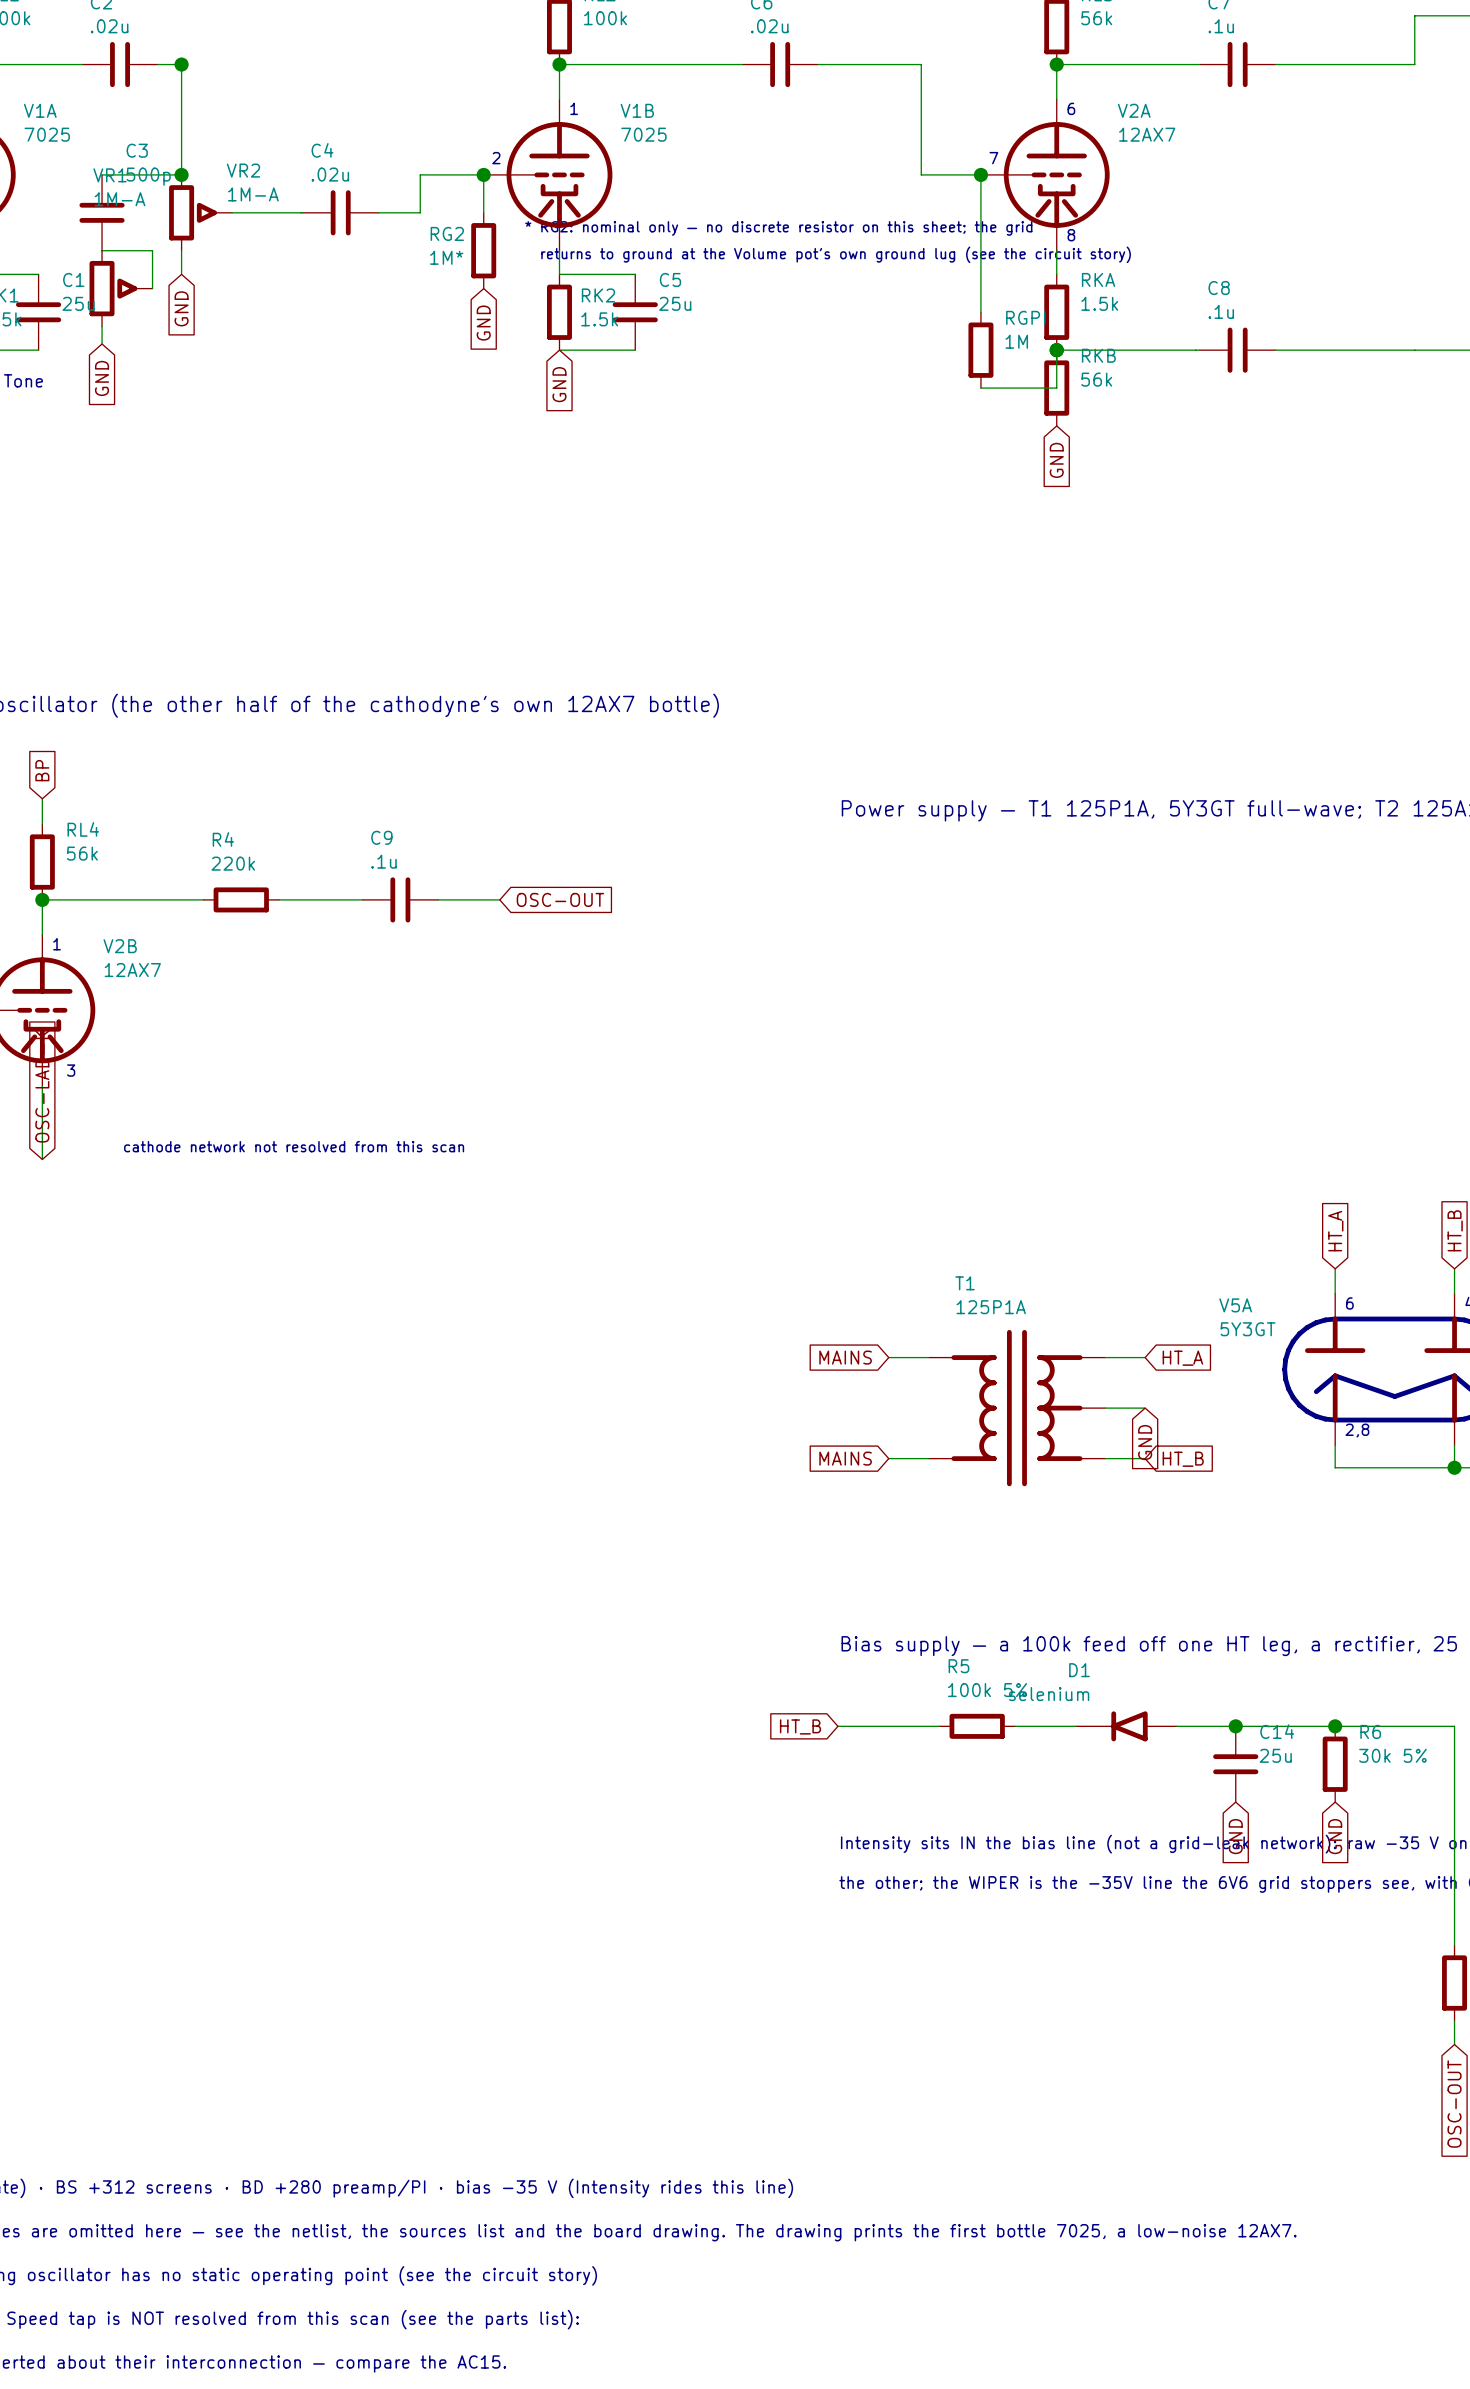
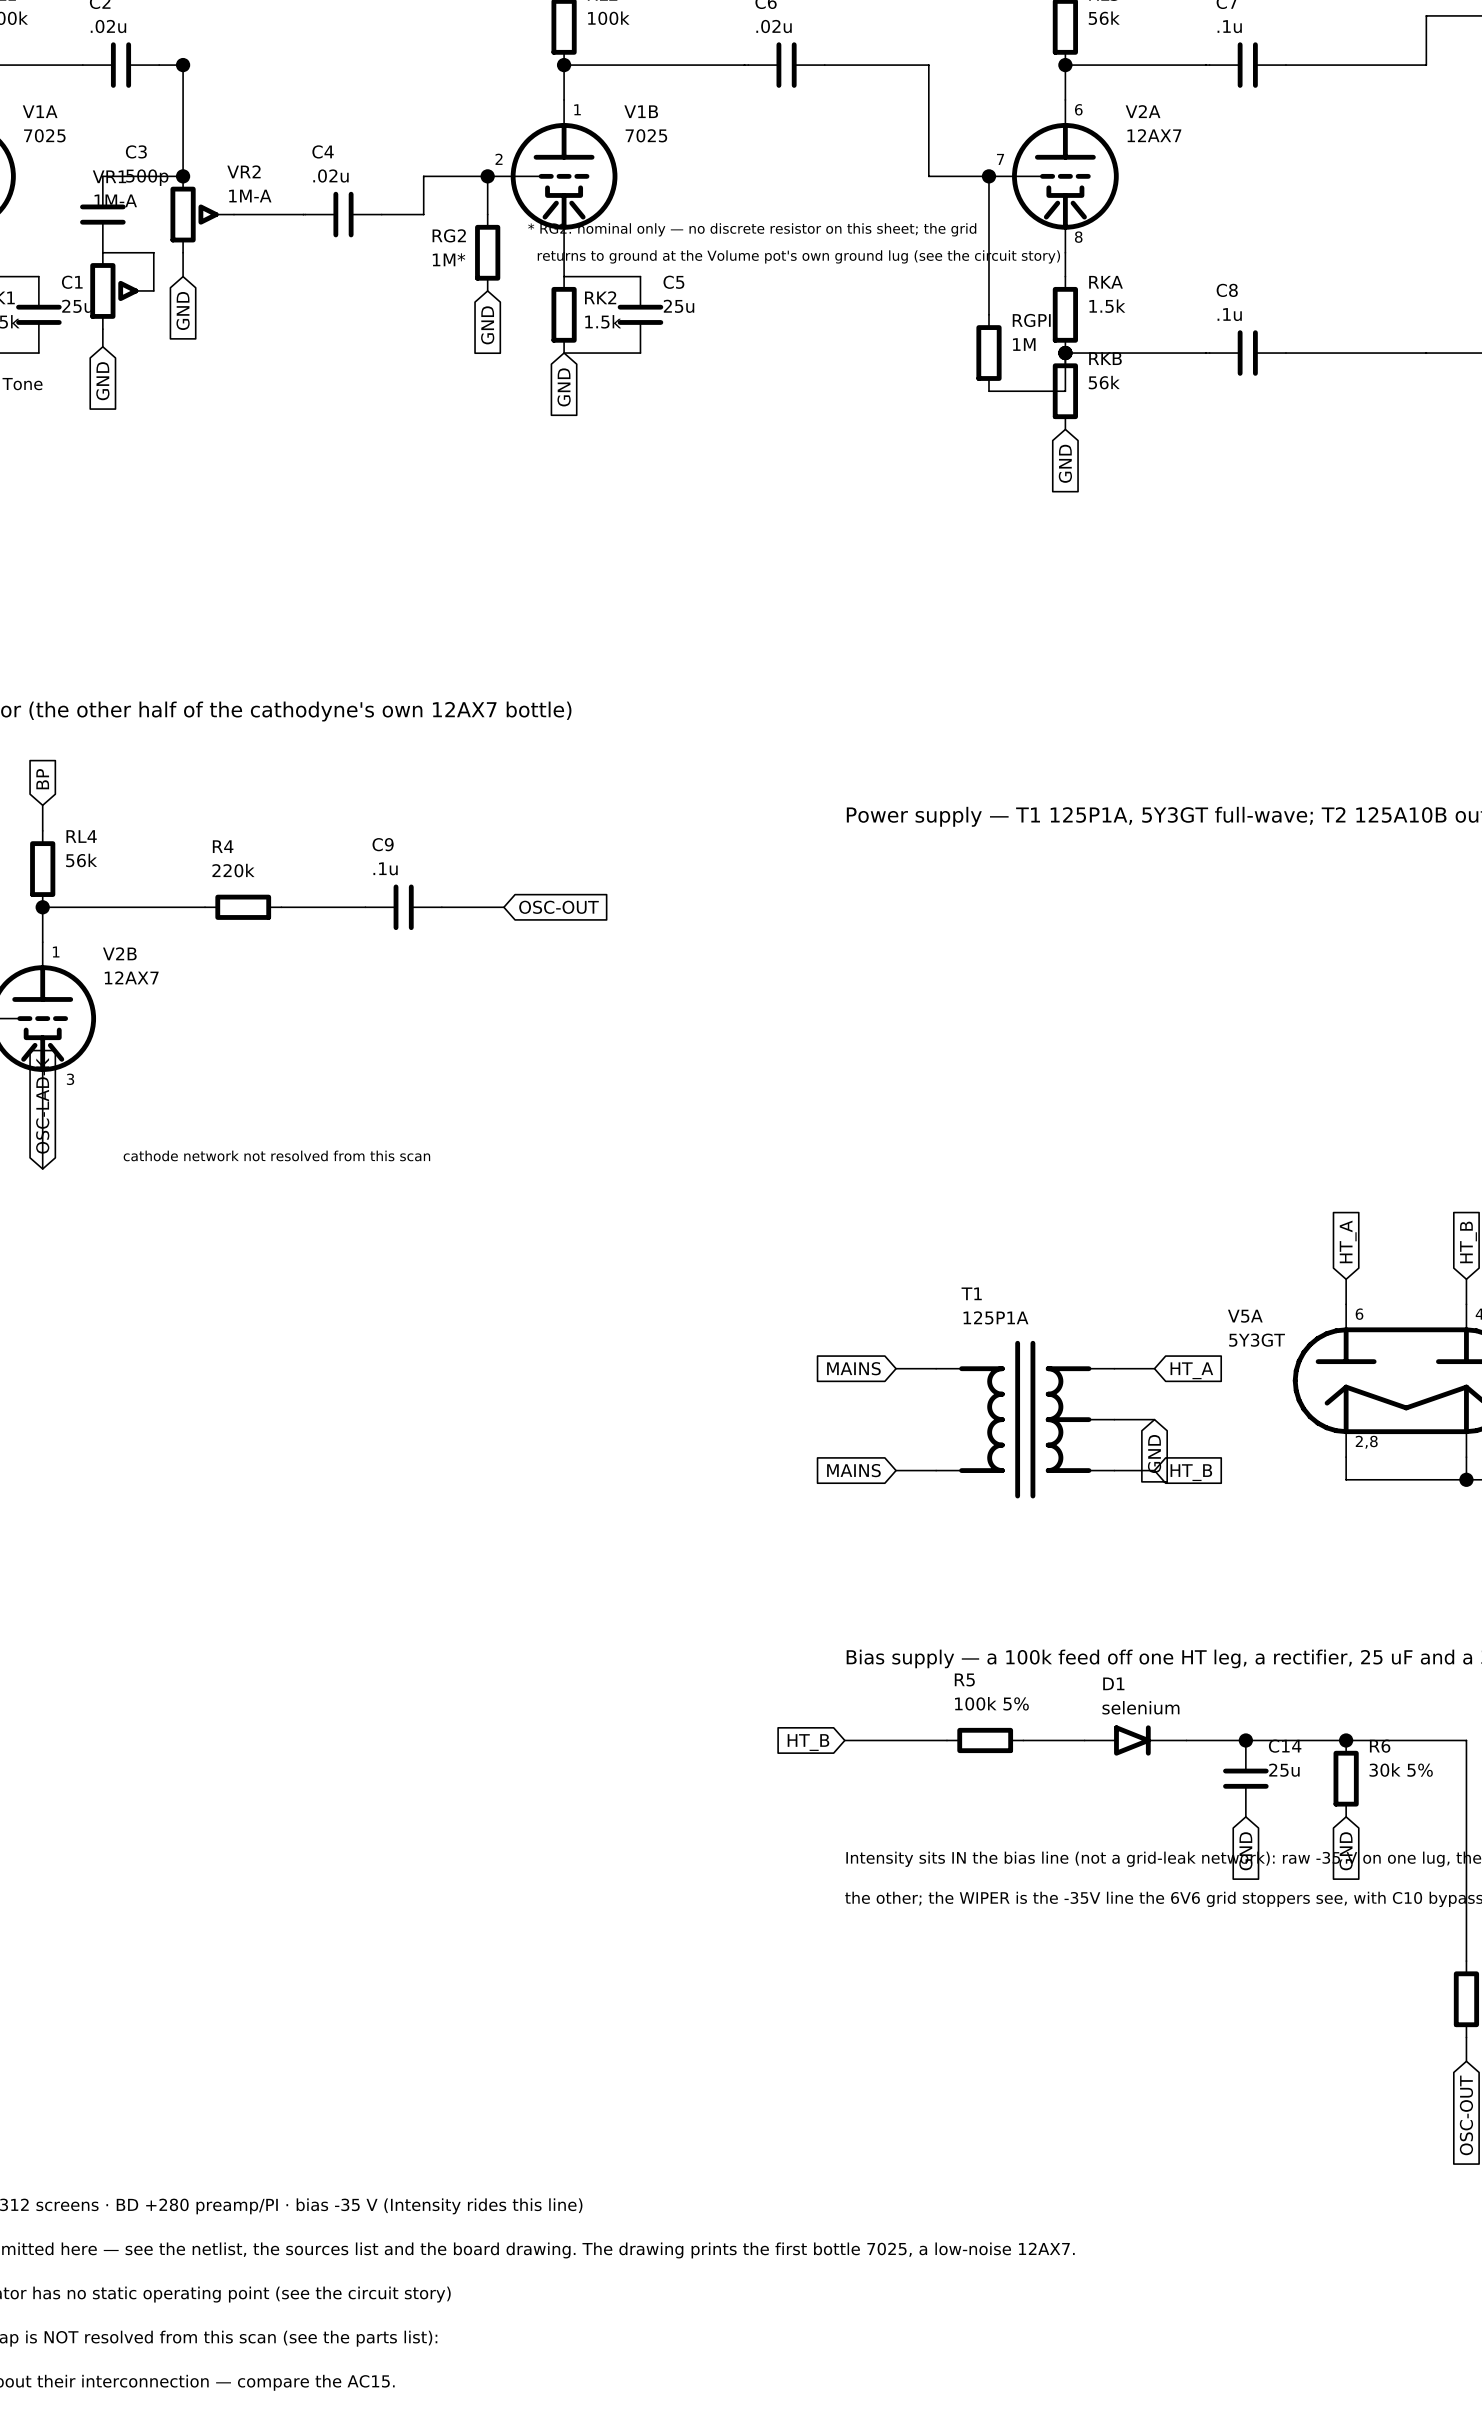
D1 name position: D1 (1079, 1670) -> D1 (1113, 1683)
D1 value position: selenium (1049, 1694) -> selenium (1140, 1707)
D1 rotation: 0° (1129, 1726) -> 180° (1132, 1740)

